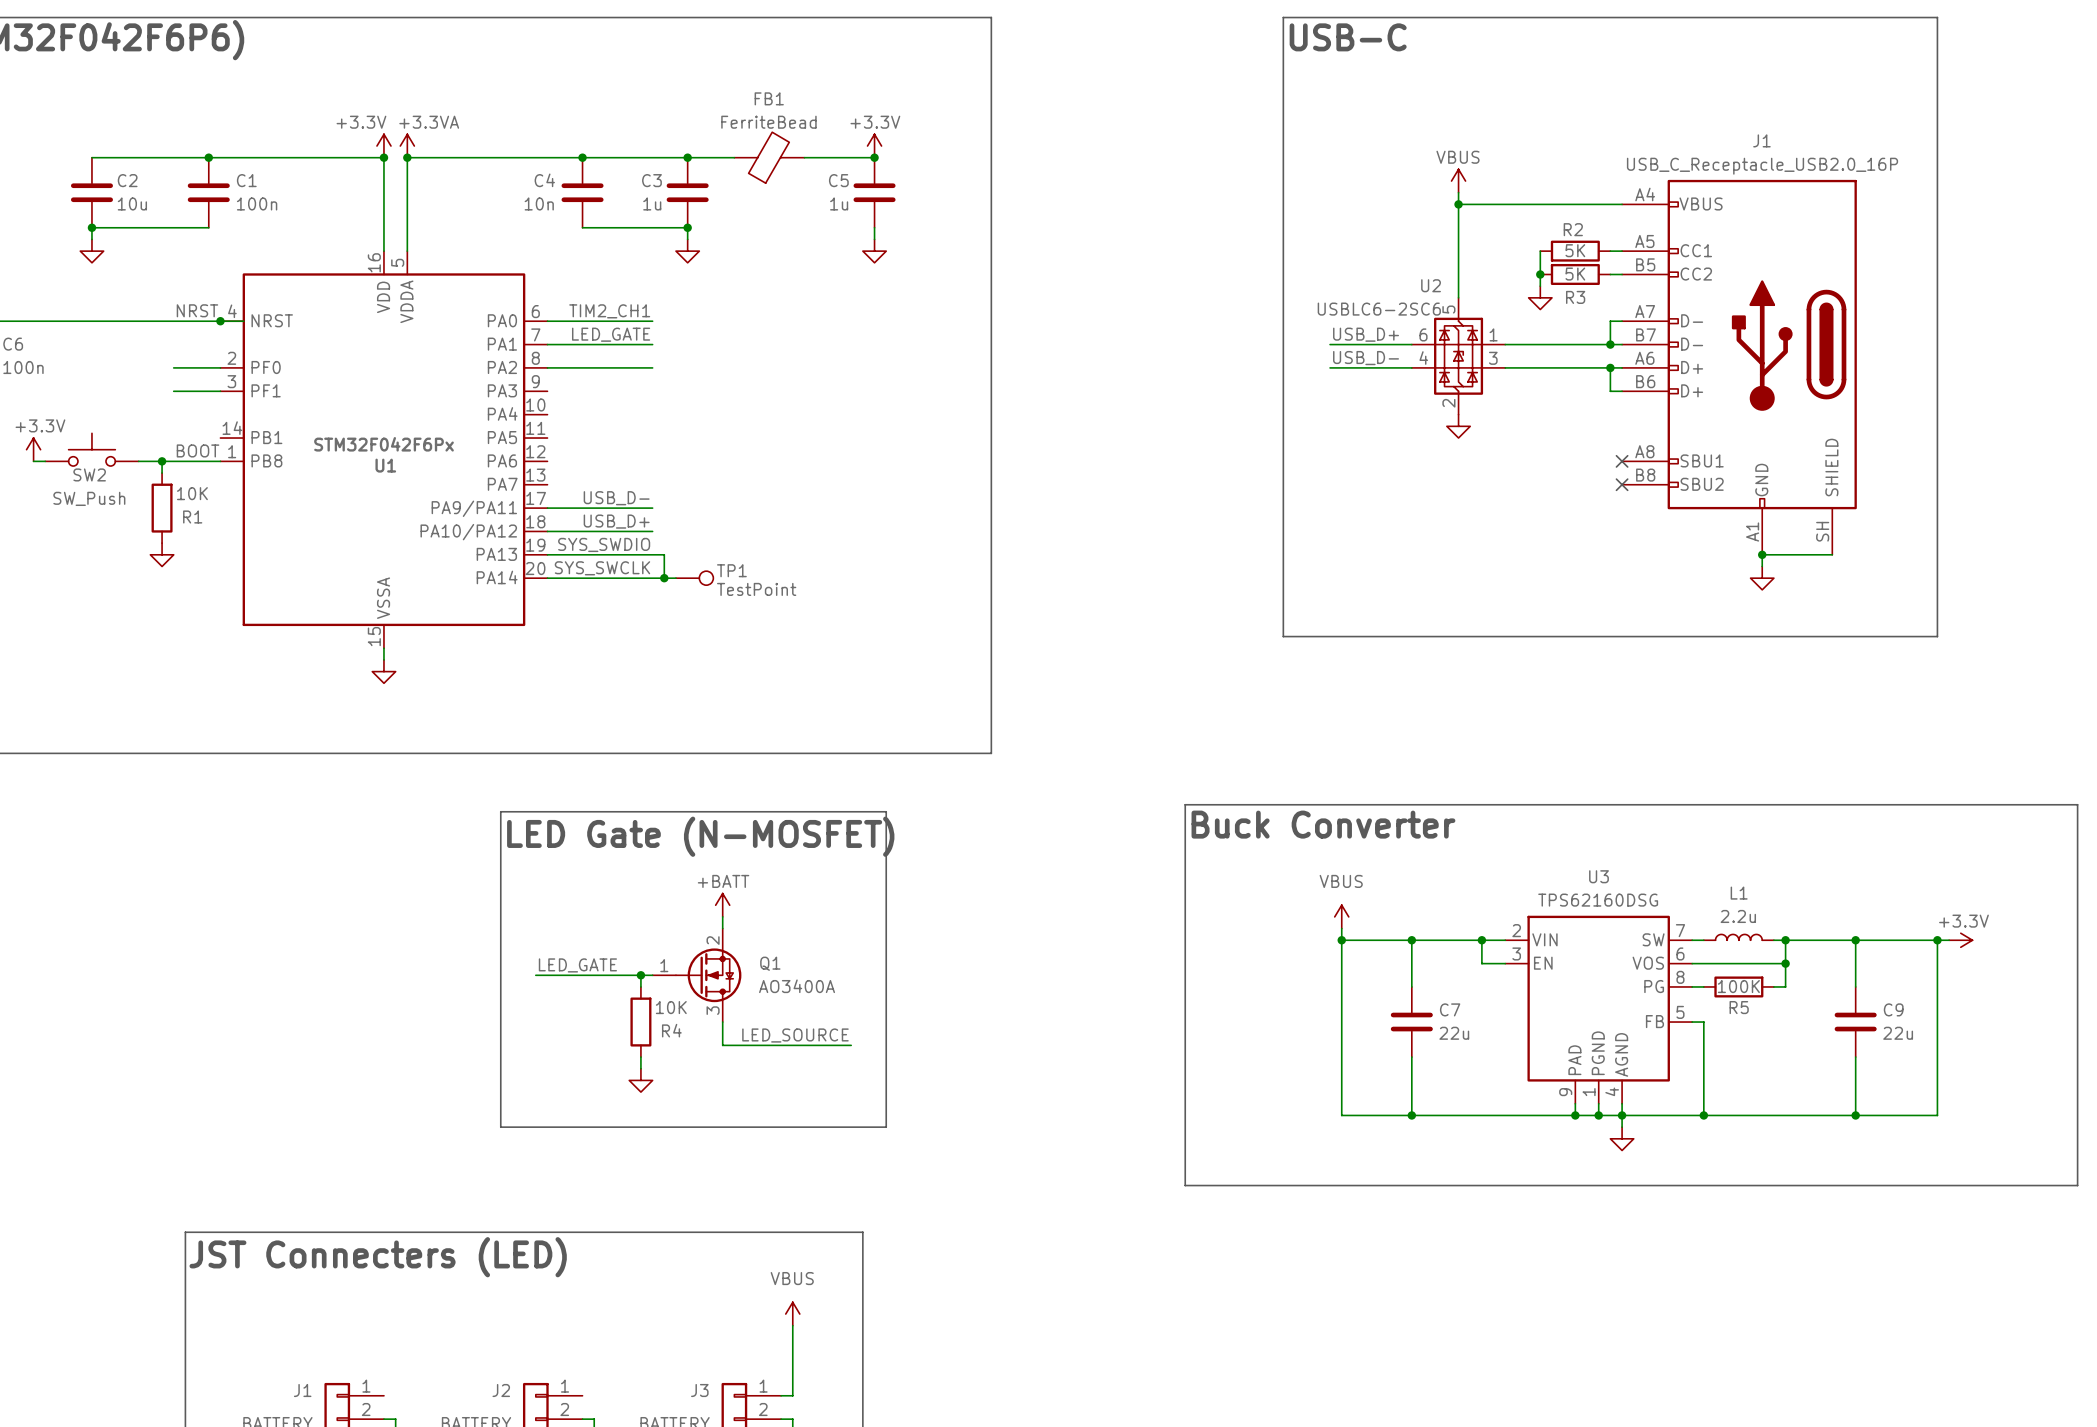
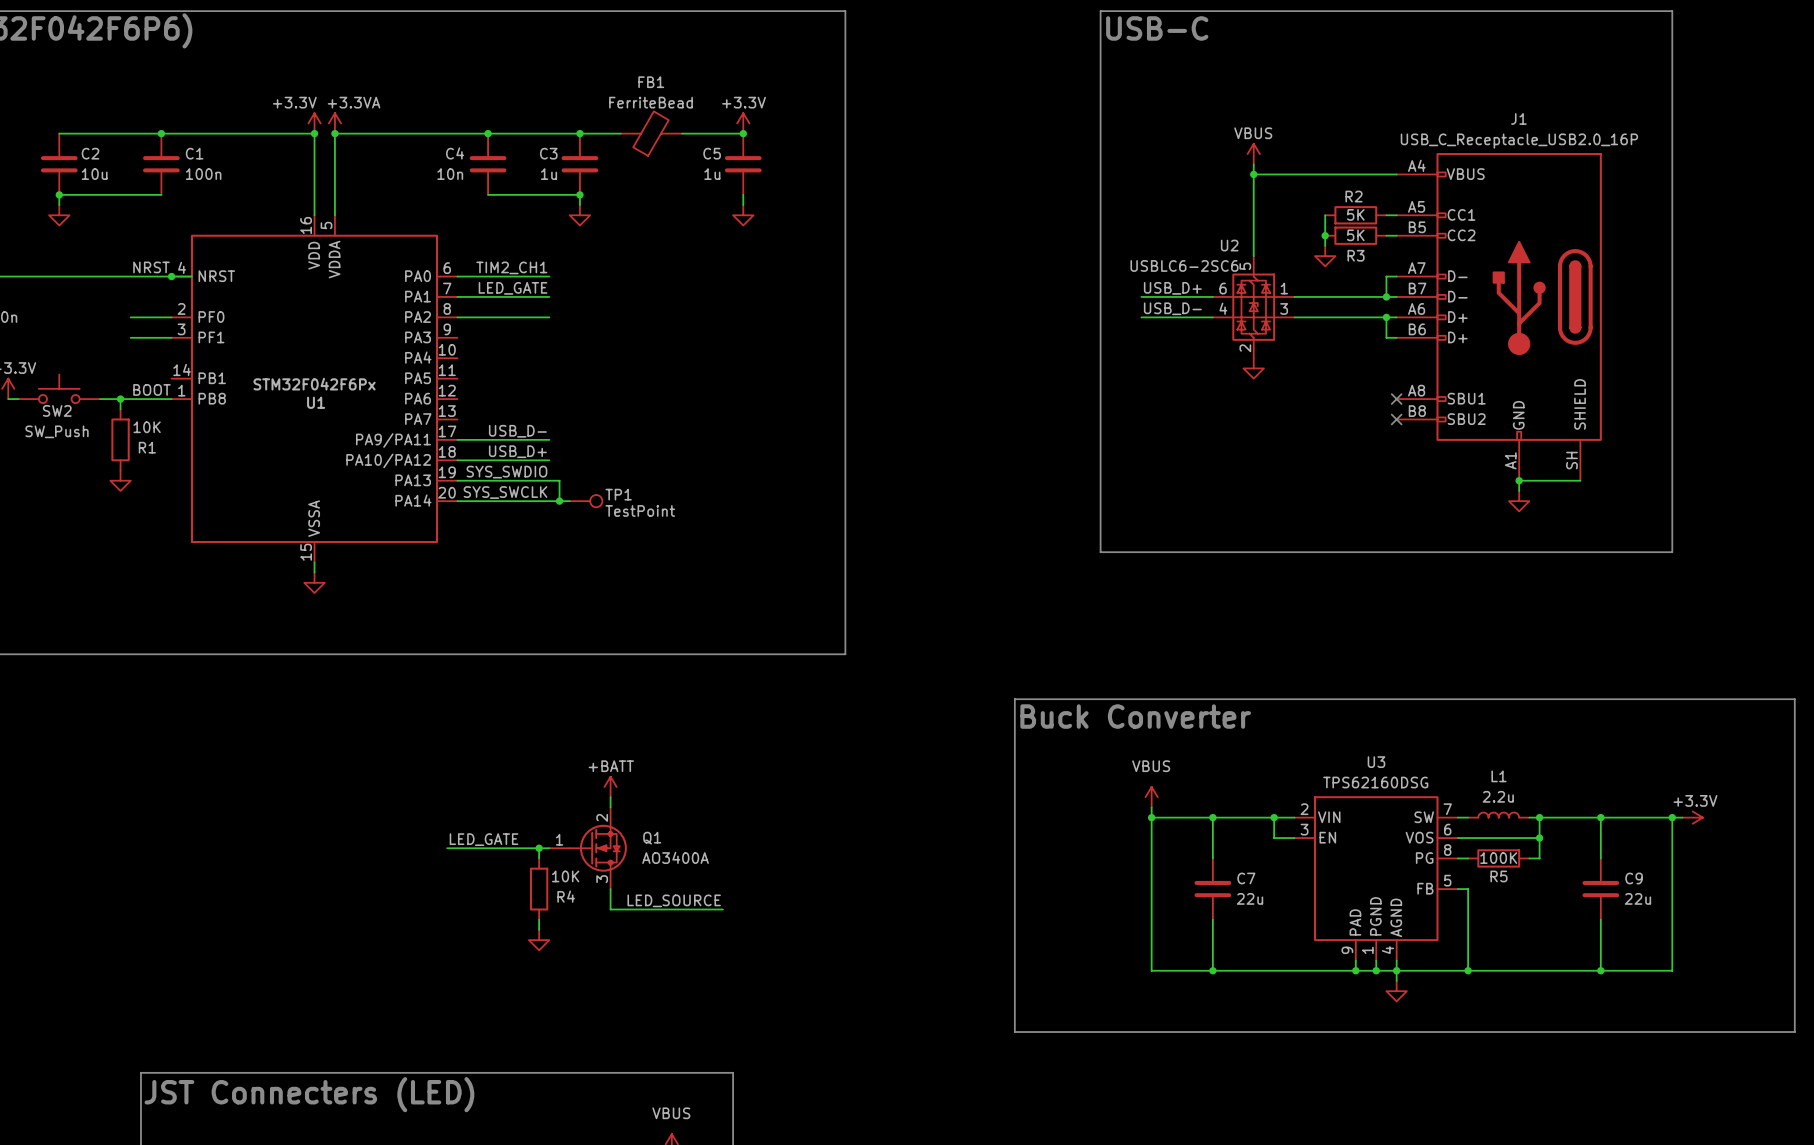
line: (500, 811) (886, 811) (886, 1127) (500, 1127) (500, 811) -> none
text: LED Gate (N-MOSFET) (700, 836) -> none

